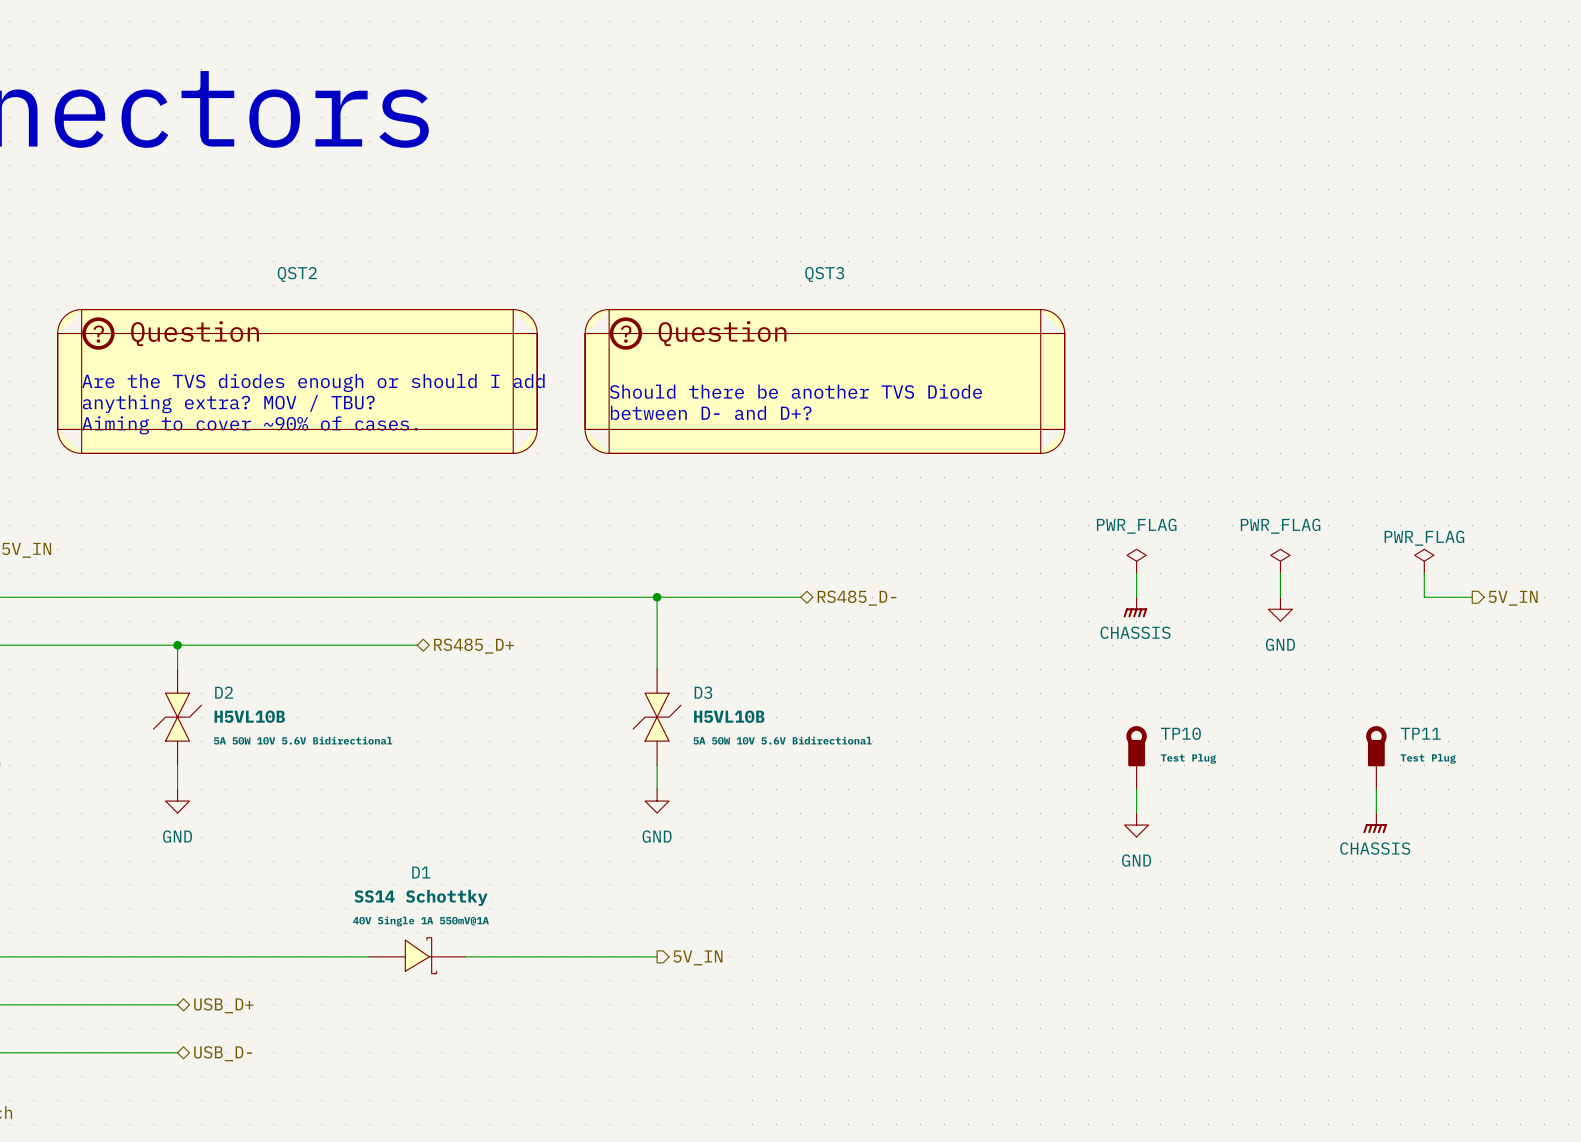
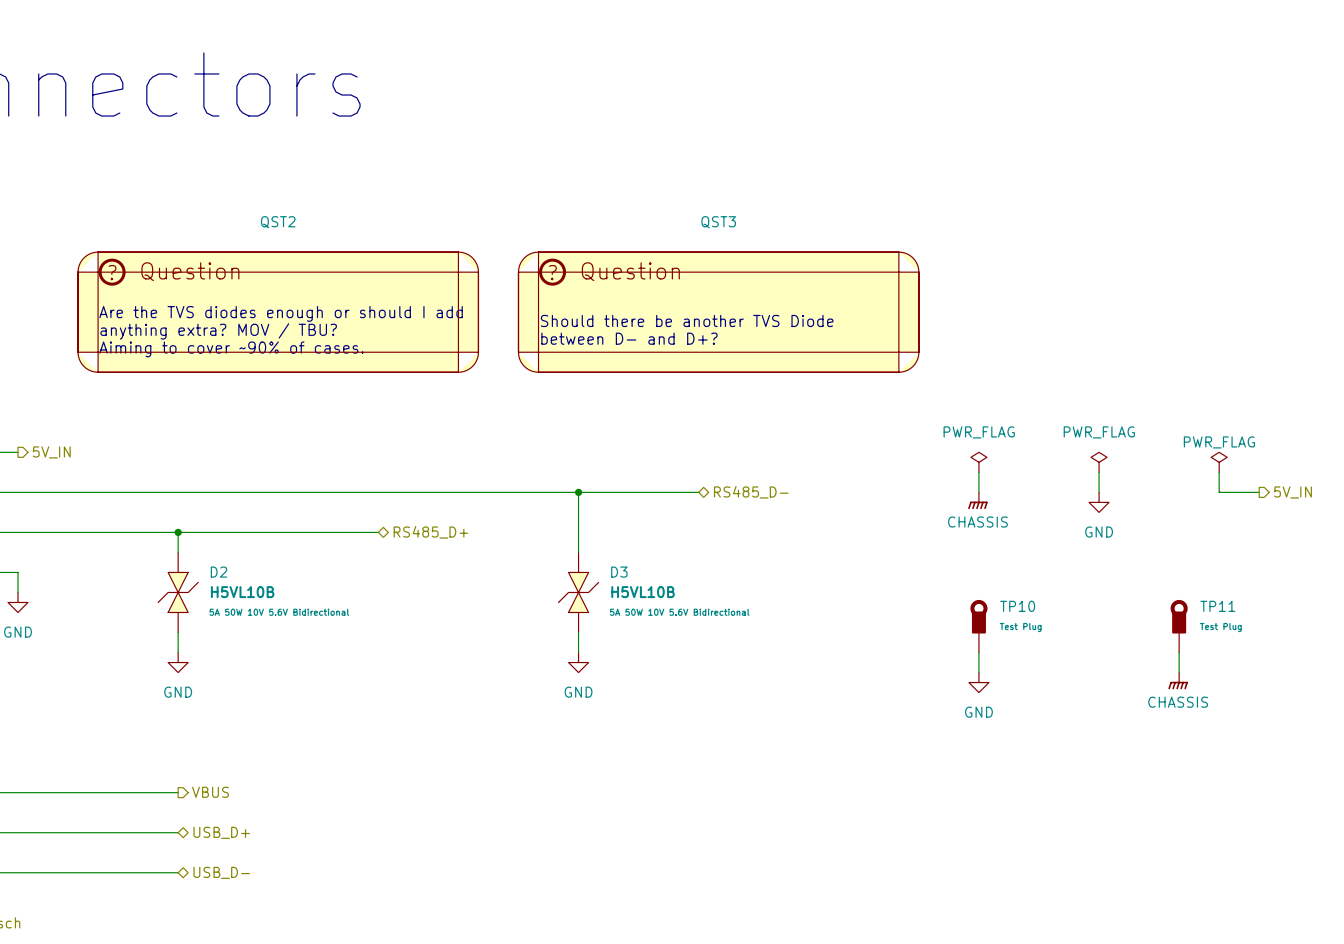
D1: SS14 Schottky (417, 955) -> none
wire: (177, 956) (369, 956) -> none
hierarchical label: none -> VBUS (210, 792)
wire: (465, 956) (657, 956) -> none
hierarchical label: 5V_IN (698, 957) -> none

